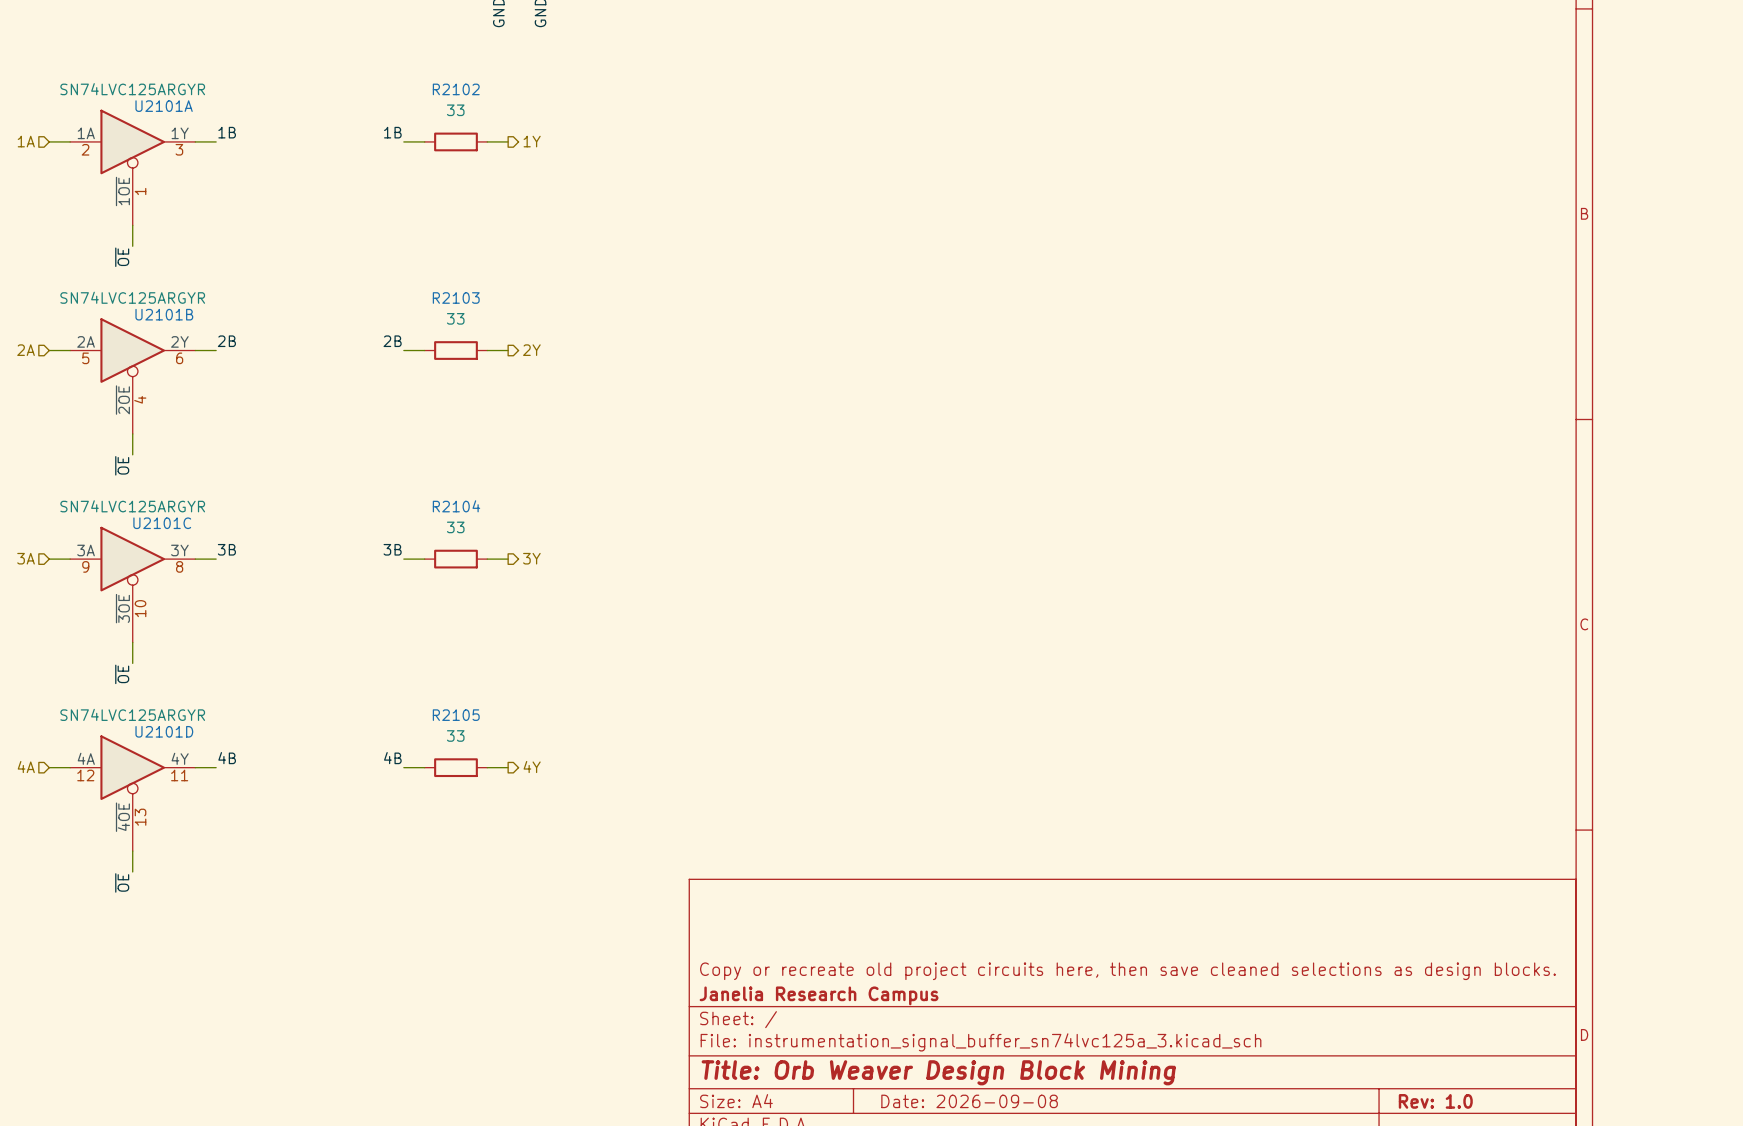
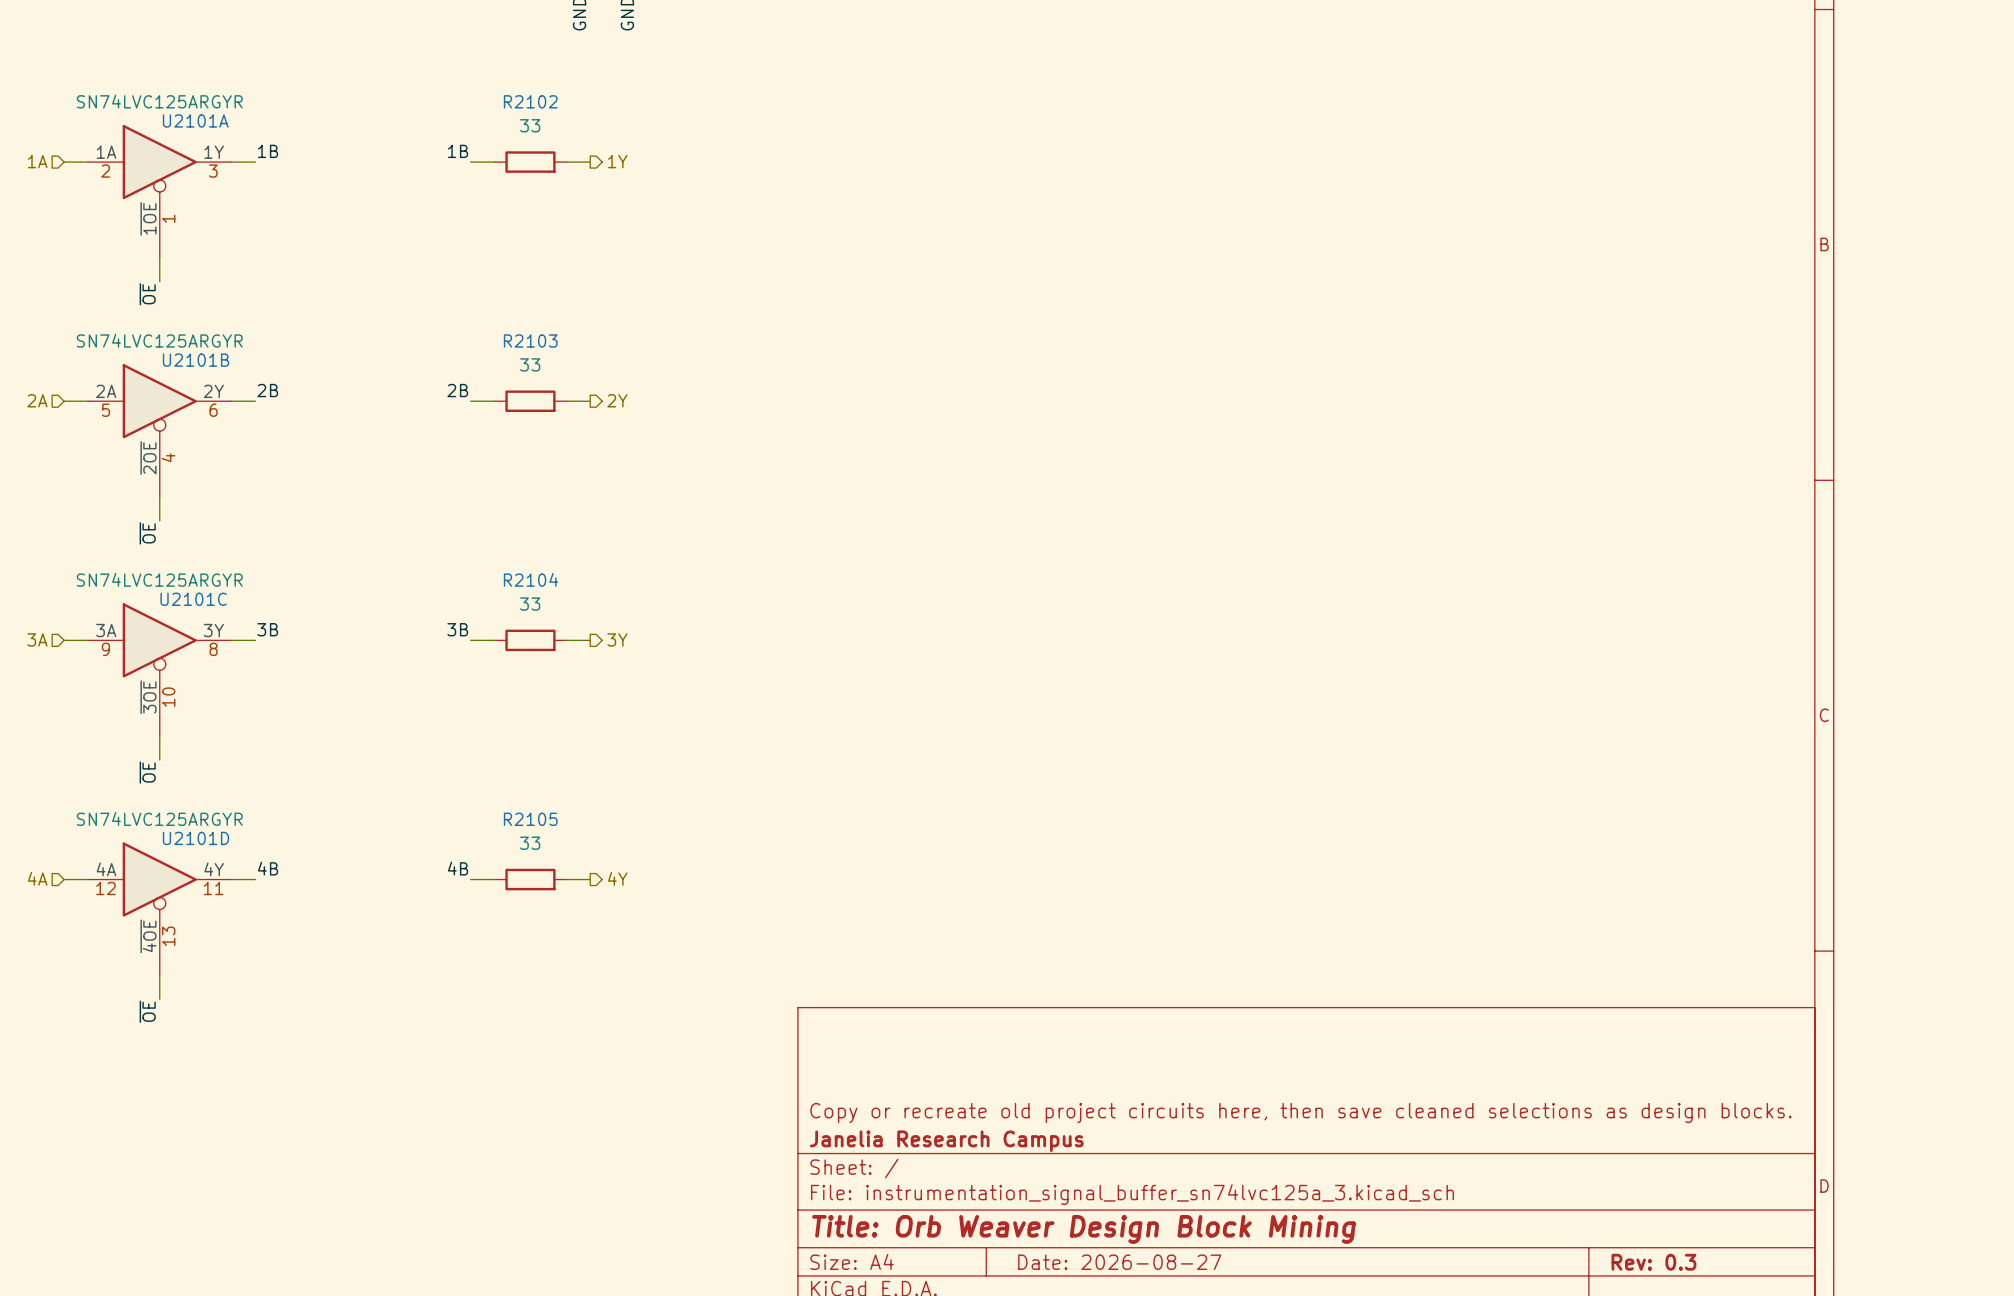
title block: Date: 2026-09-08 (969, 1101) -> Date: 2026-08-27 (1119, 1262)
title block: Rev: 1.0 (1435, 1101) -> Rev: 0.3 (1653, 1262)

